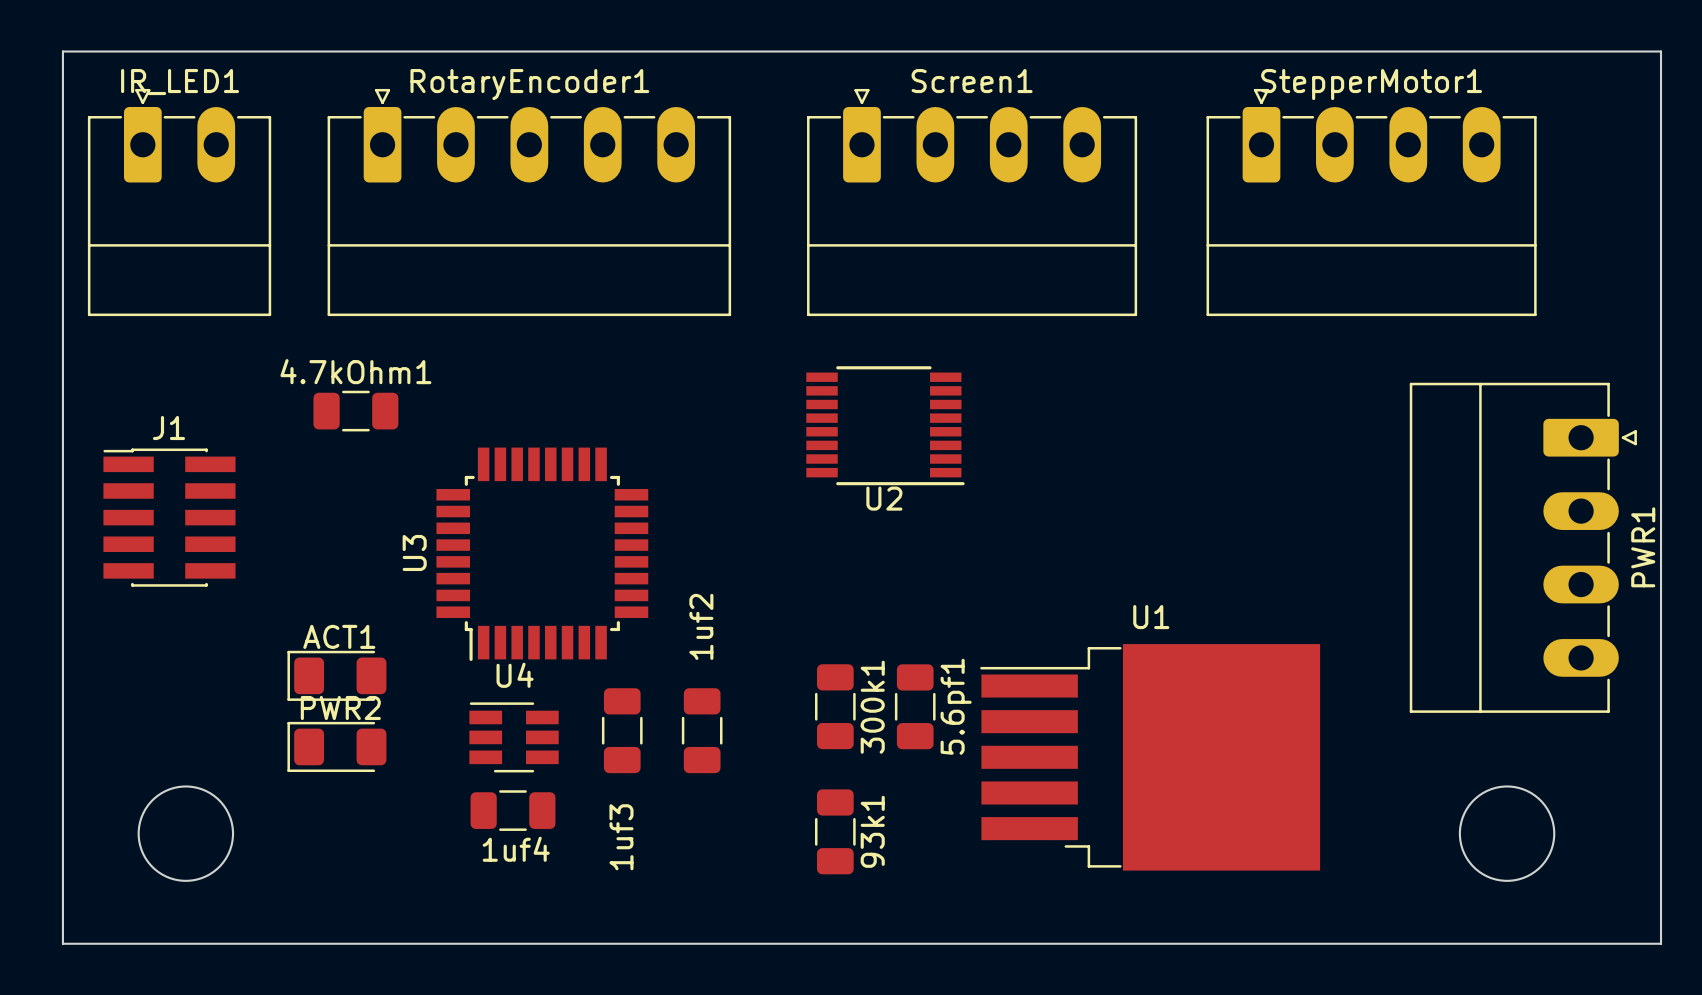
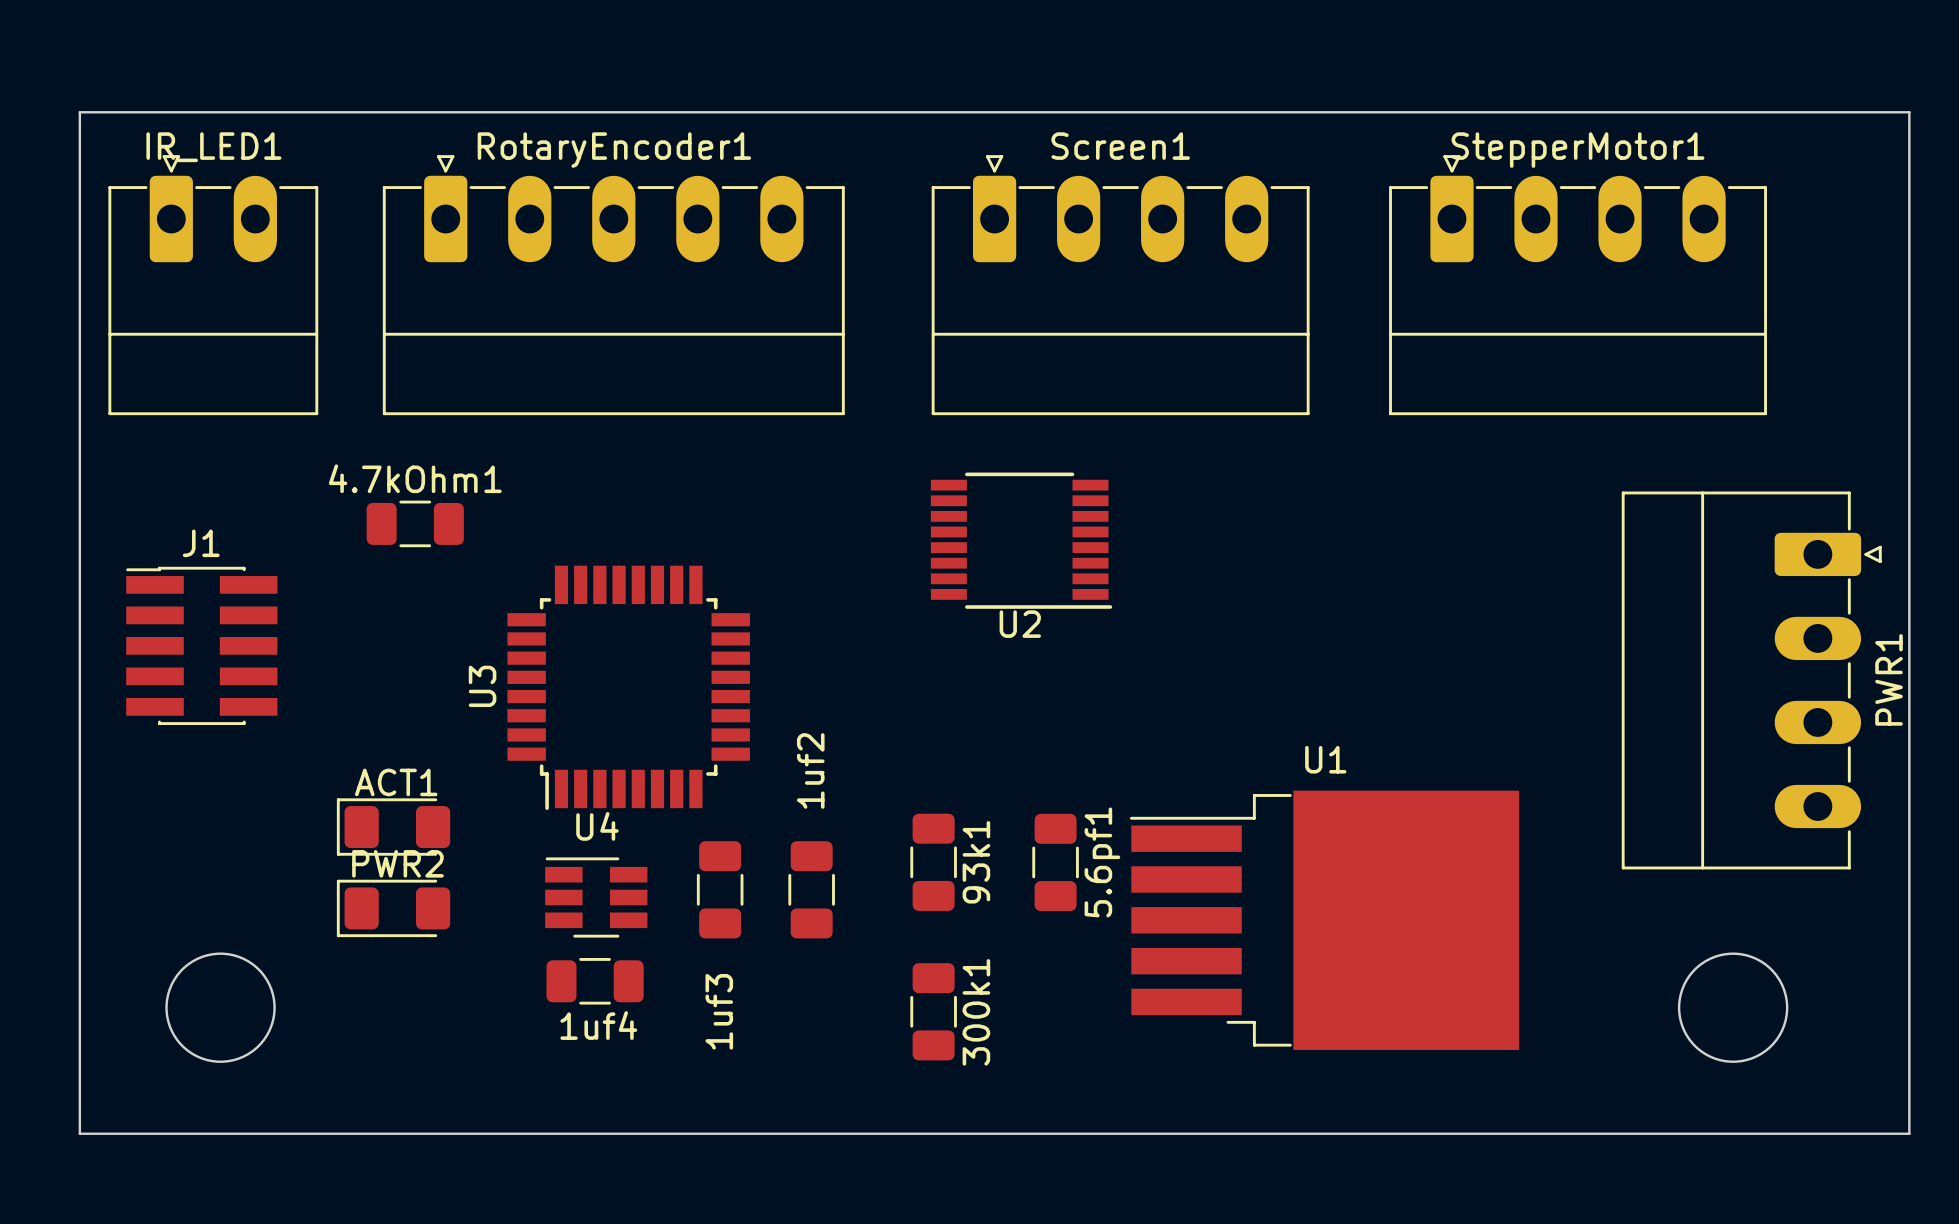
300k1 position: (835, 706) -> (933, 1011)
93k1 position: (835, 831) -> (933, 862)

